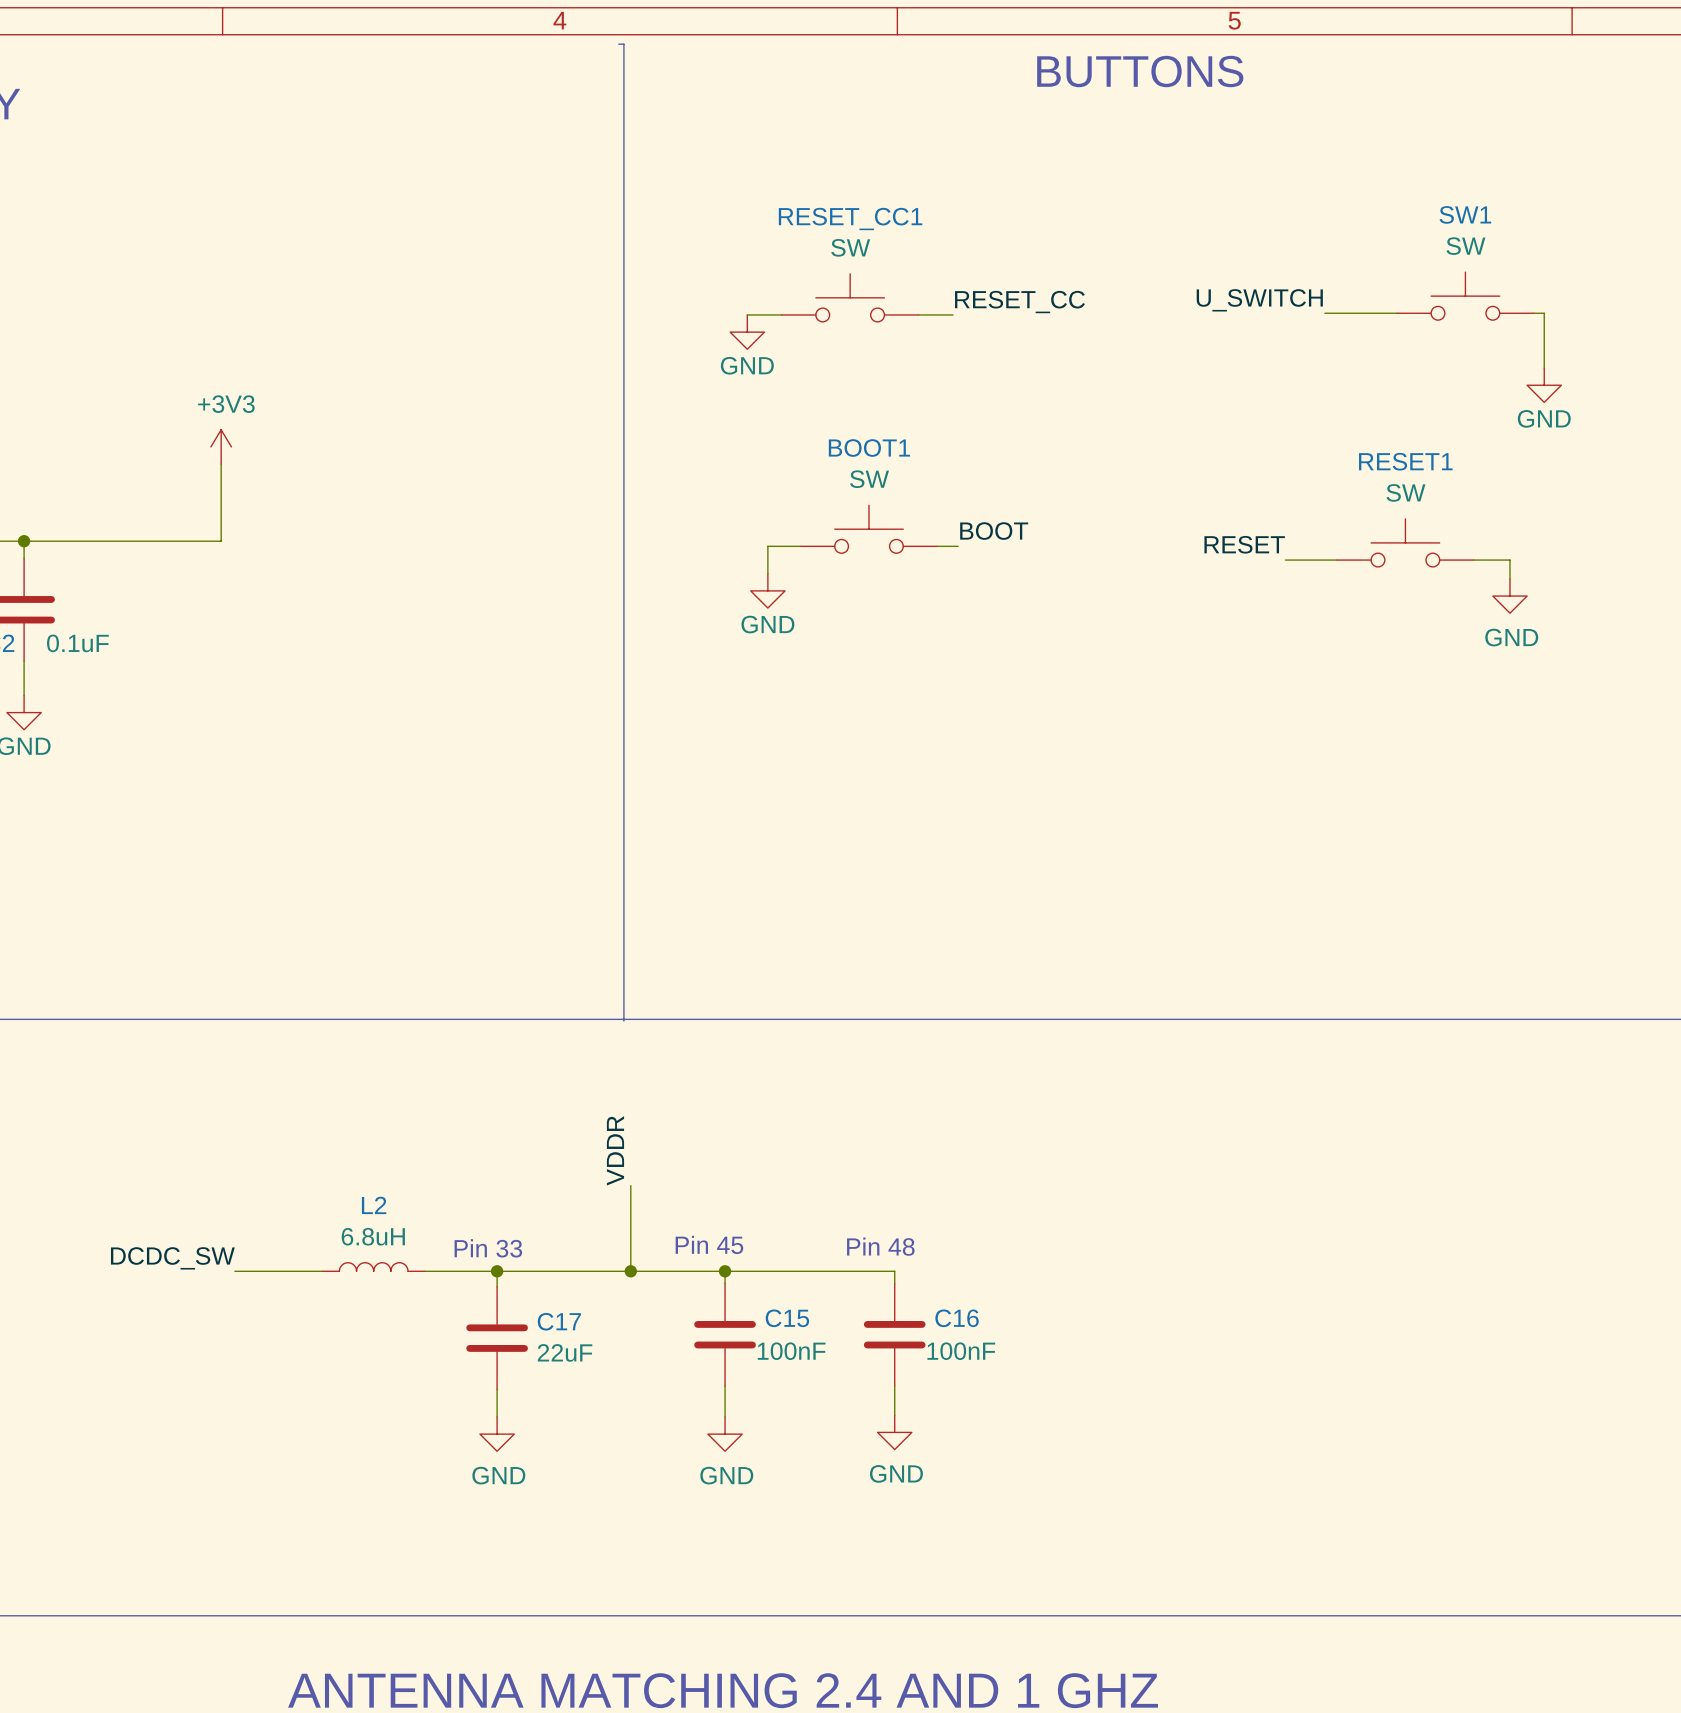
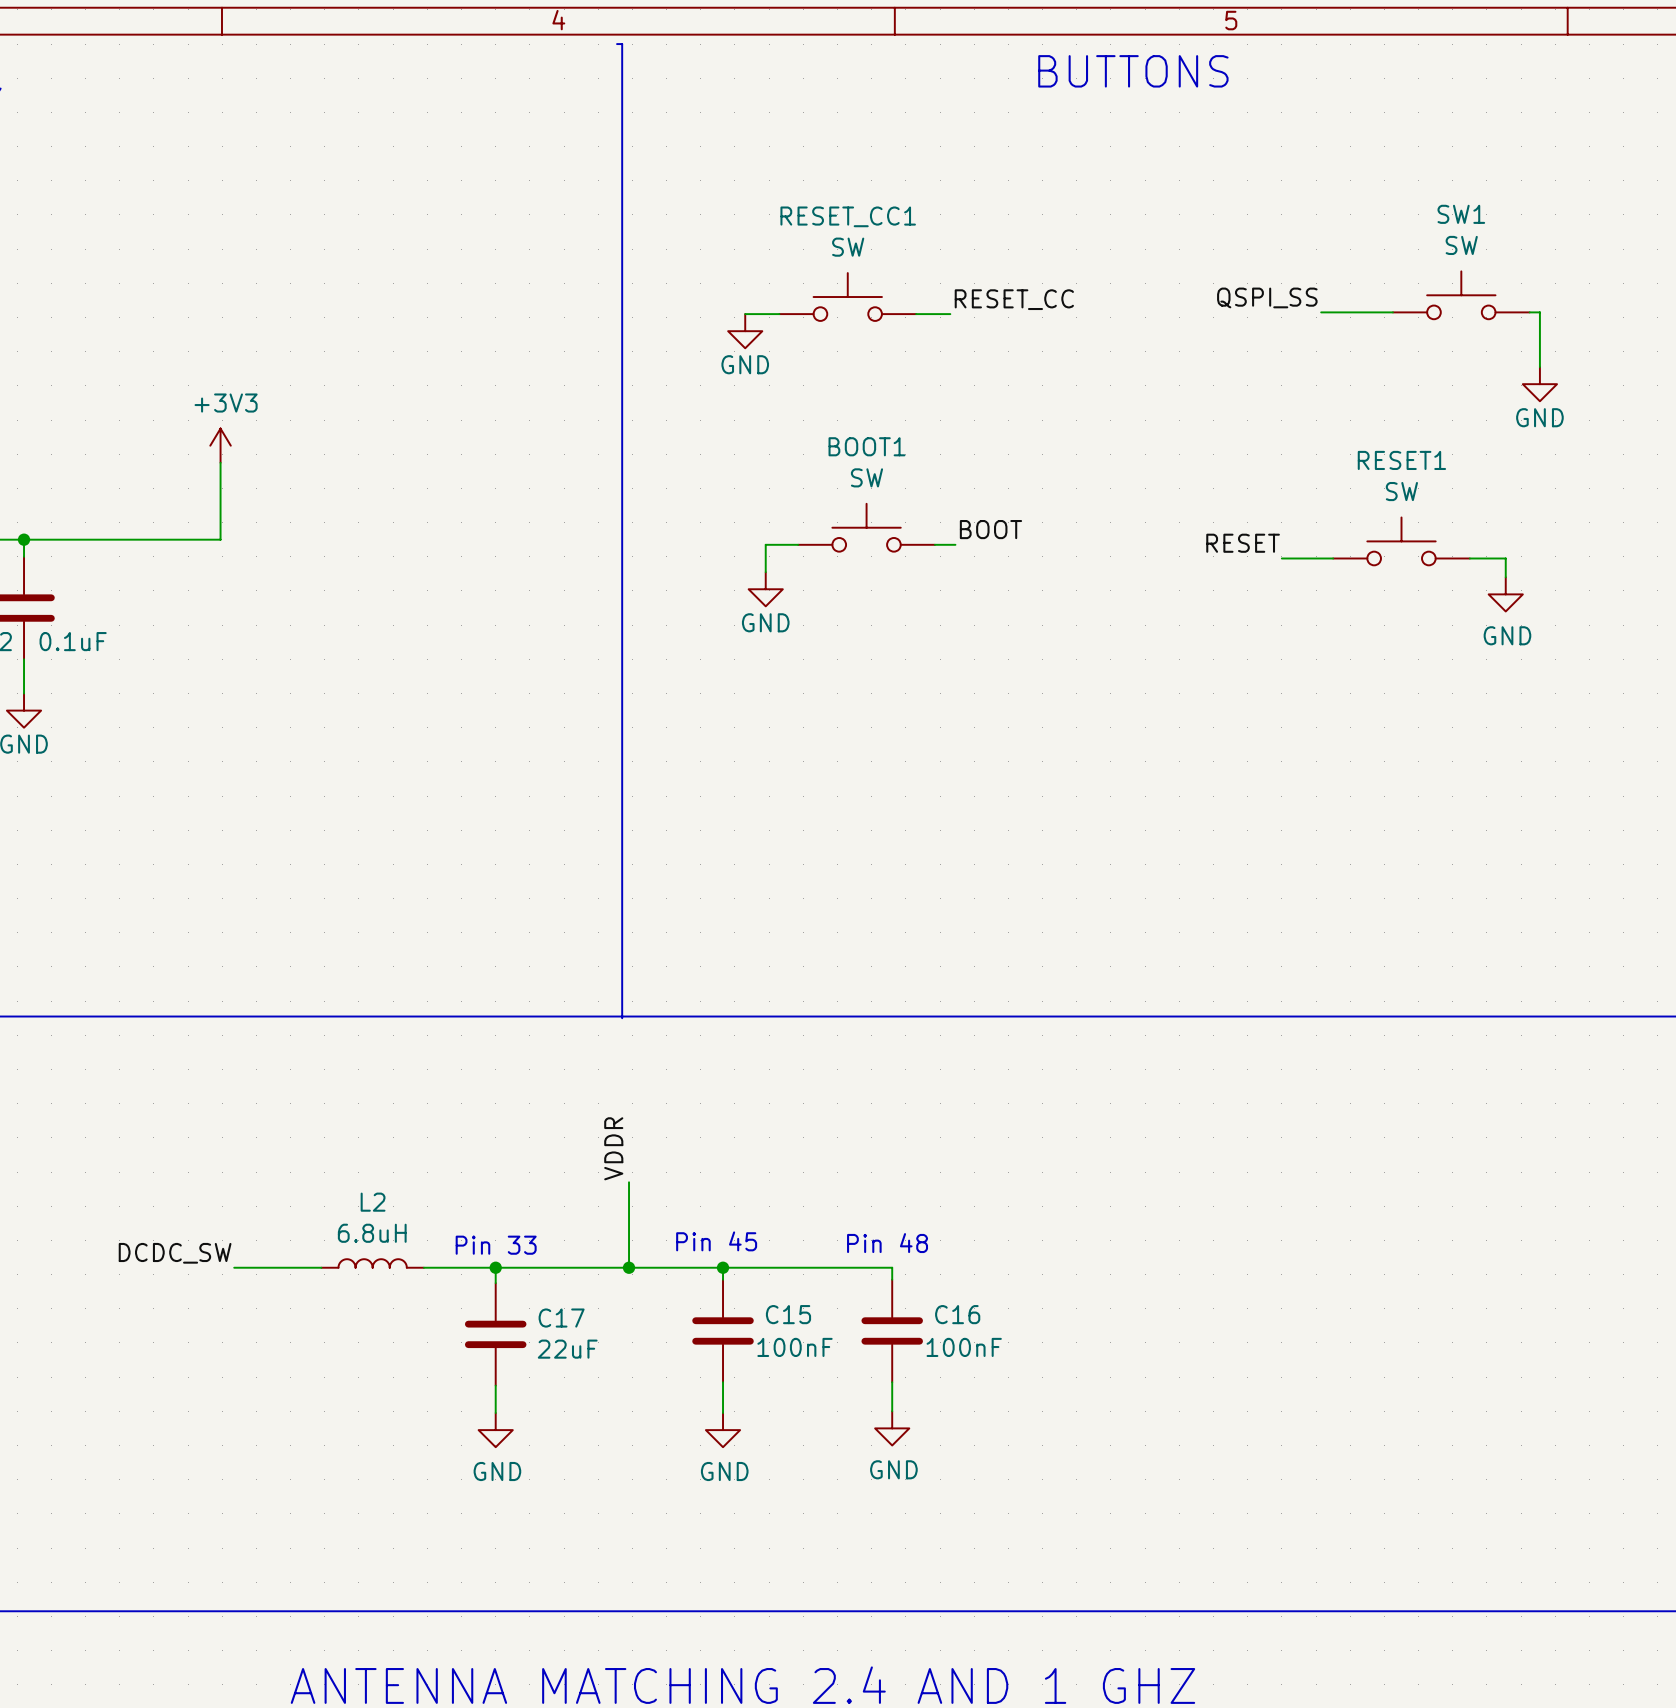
label: U_SWITCH (1259, 300) -> QSPI_SS (1267, 297)

